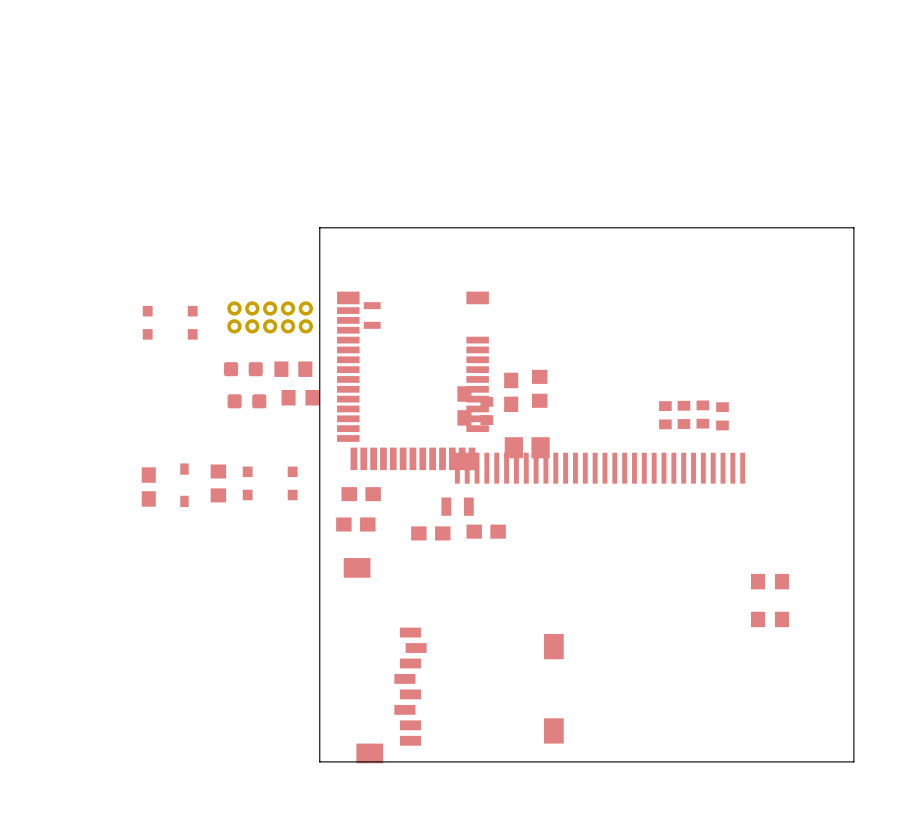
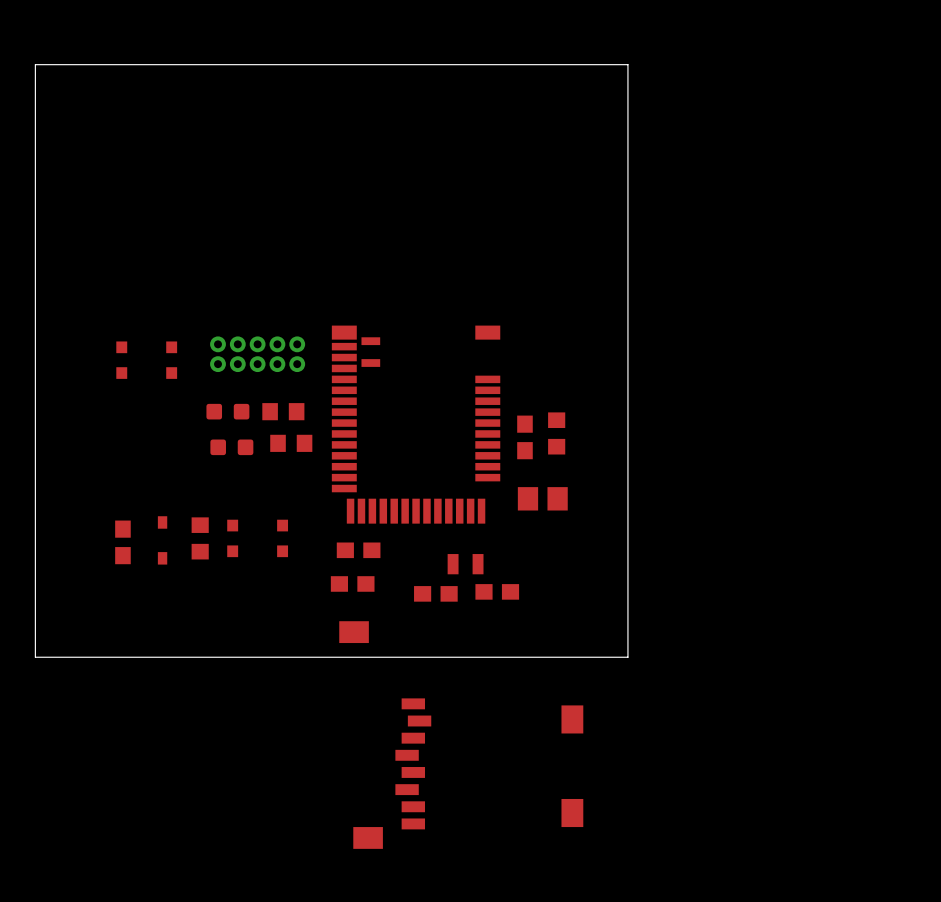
board edge: (853, 227) (319, 227) (319, 761) (853, 761) (853, 227) -> (627, 64) (35, 64) (35, 657) (627, 657) (627, 64)
part: (464, 405) -> none
part: (486, 410) -> none
part: (683, 414) -> none
part: (702, 414) -> none
part: (665, 415) -> none
part: (722, 416) -> none
part: (600, 468) -> none
part: (769, 581) -> none
part: (769, 619) -> none

